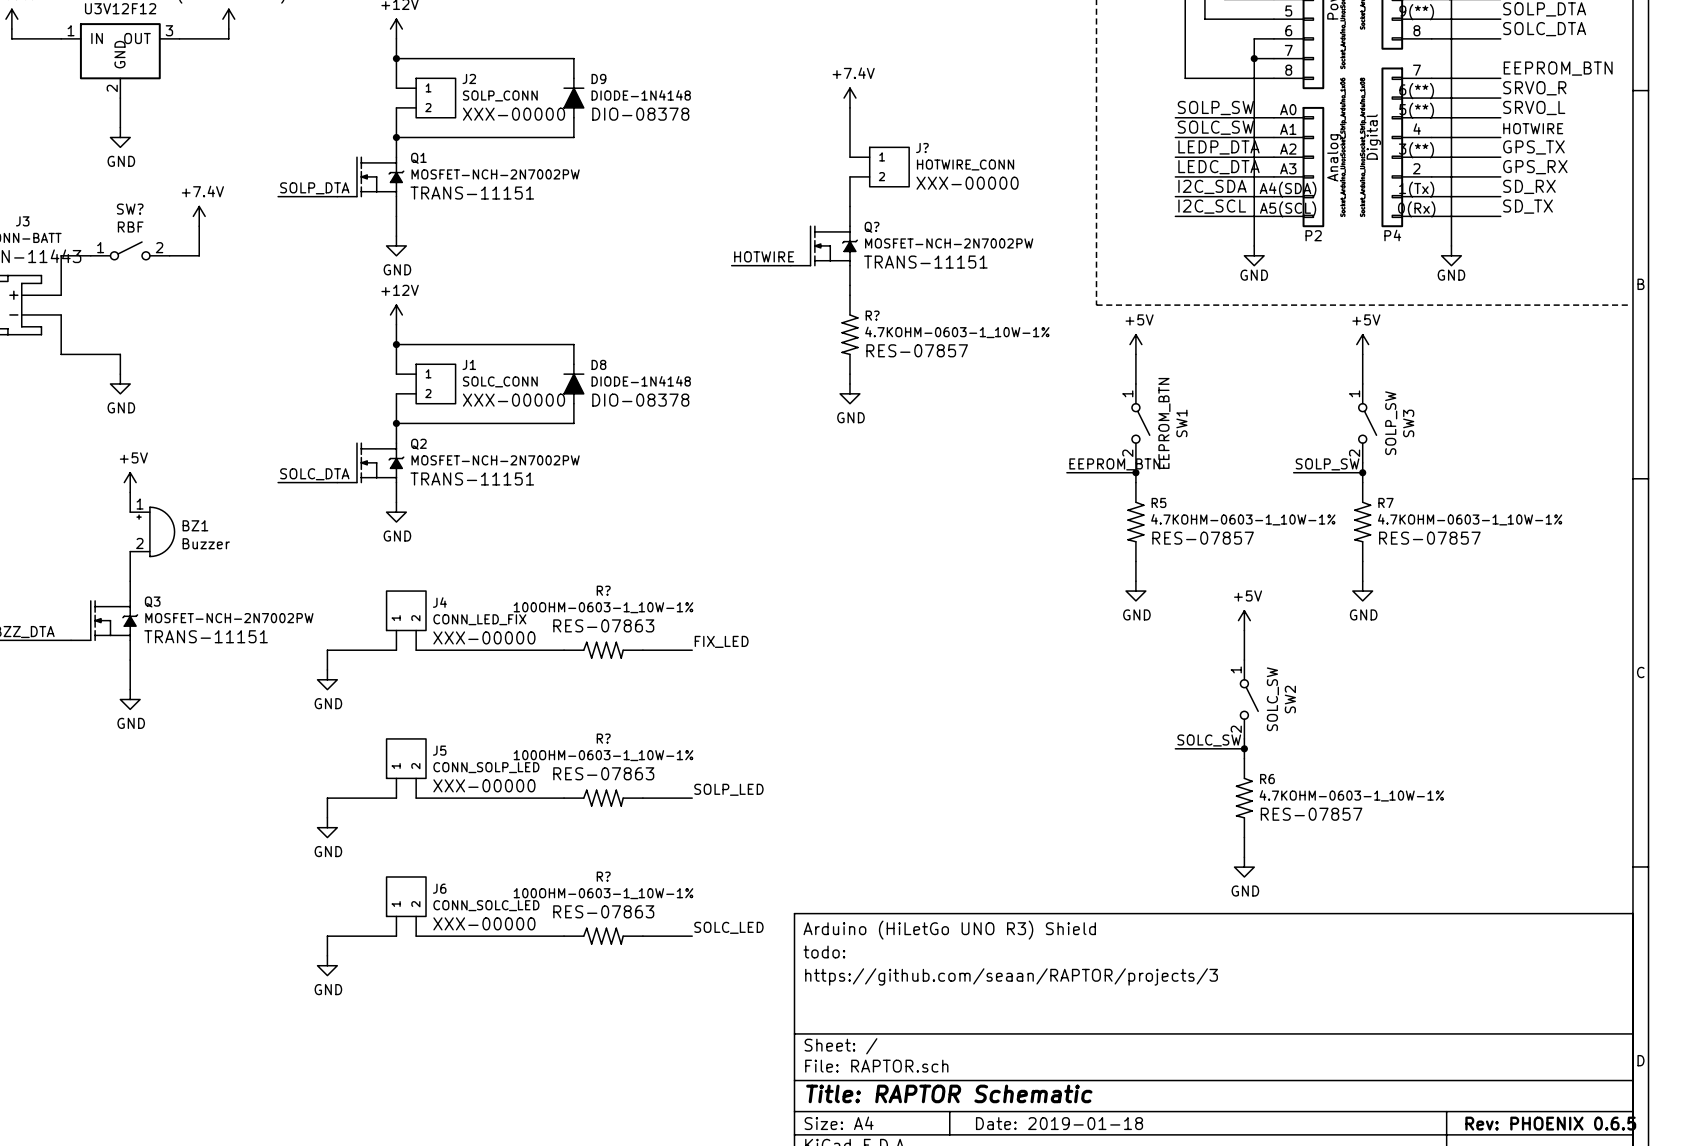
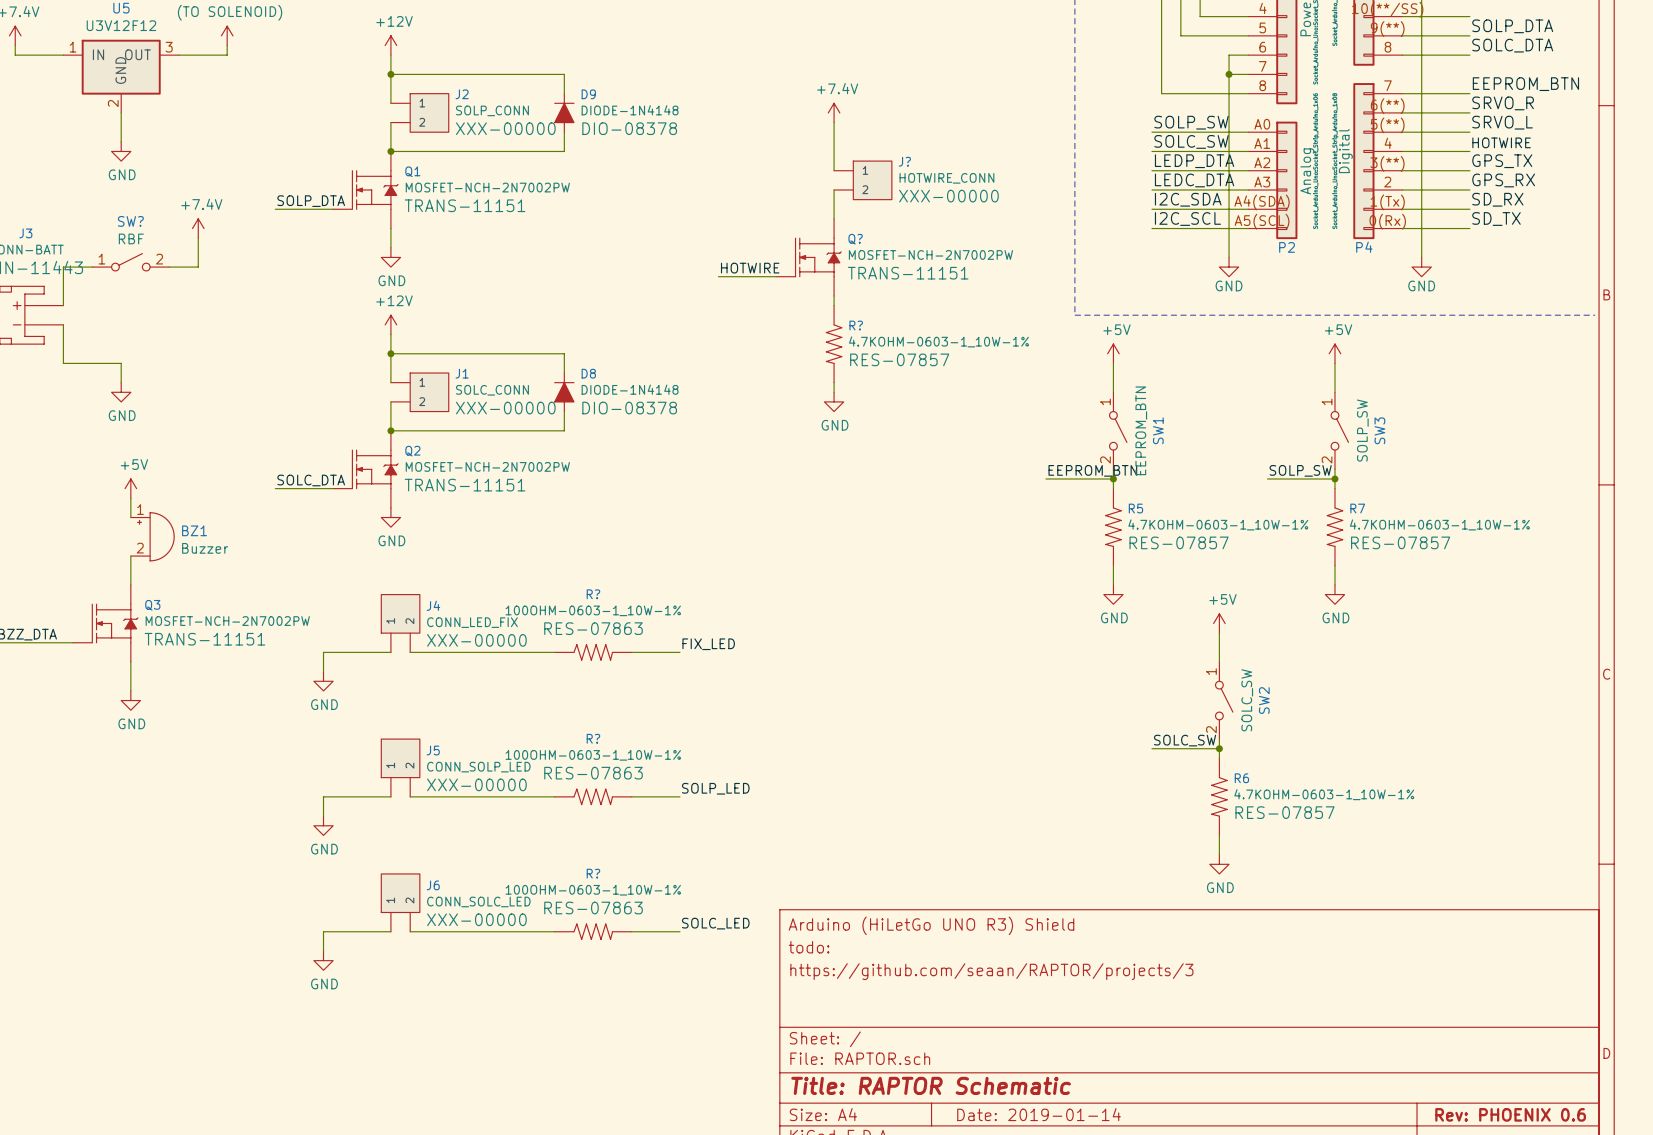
title block: Date: 2019-01-18 (1059, 1123) -> Date: 2019-01-14 (1039, 1114)
title block: Rev: PHOENIX 0.6.5 (1550, 1123) -> Rev: PHOENIX 0.6 (1510, 1114)

